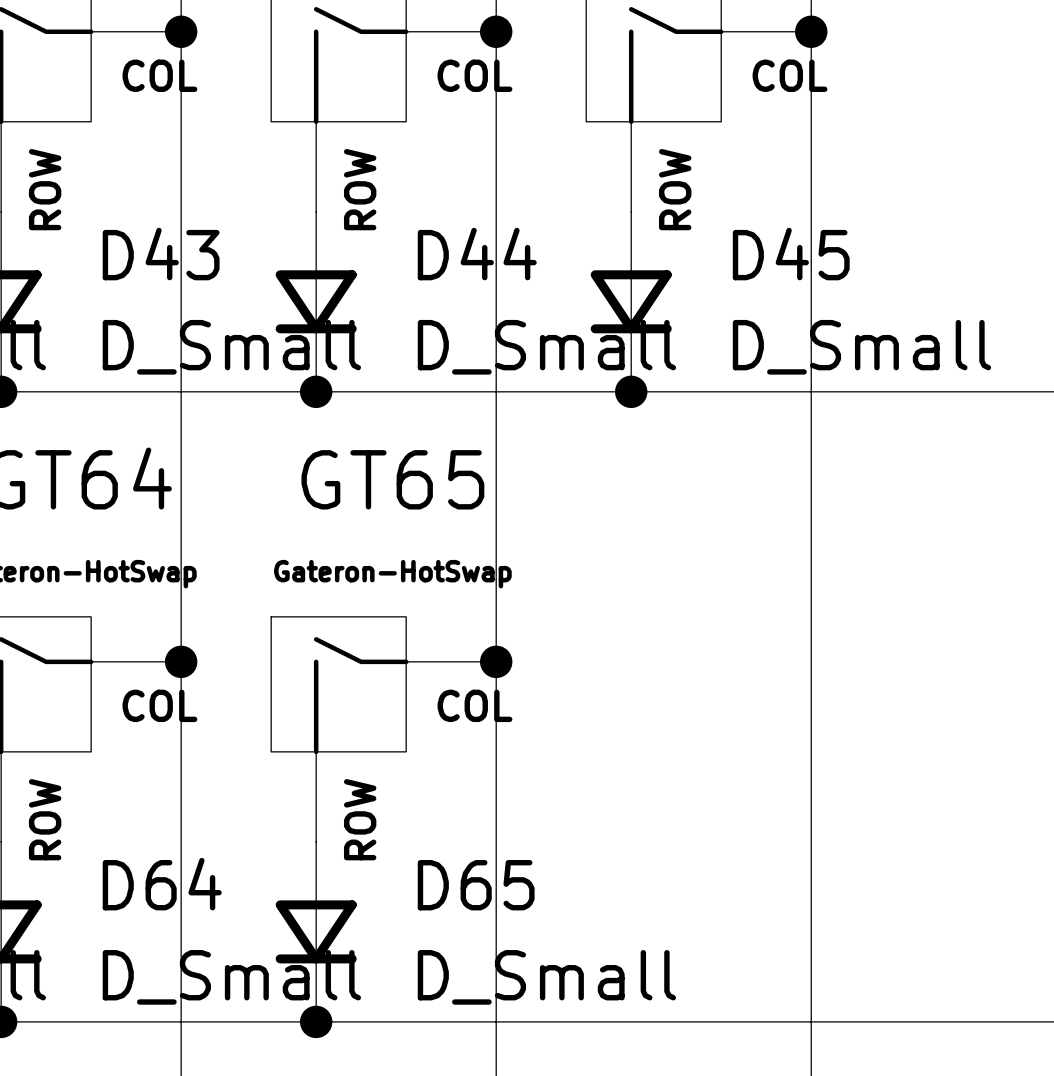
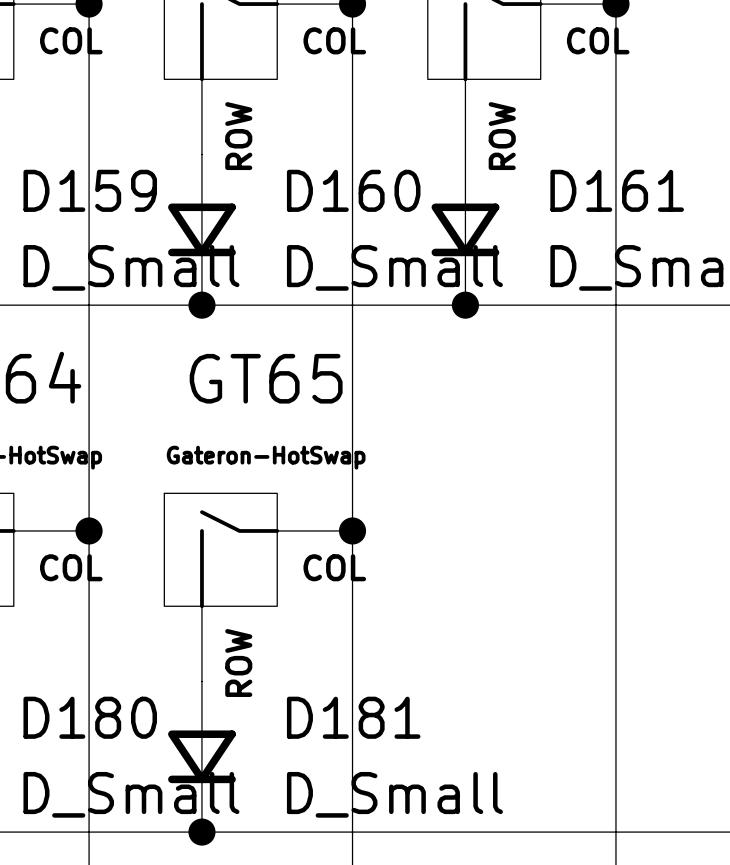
D43 name: D43 (161, 254) -> D159 (90, 190)
D44 name: D44 (477, 254) -> D160 (353, 190)
D45 name: D45 (791, 254) -> D161 (617, 190)
D64 name: D64 (162, 884) -> D180 (90, 717)
D65 name: D65 (476, 885) -> D181 (353, 717)

